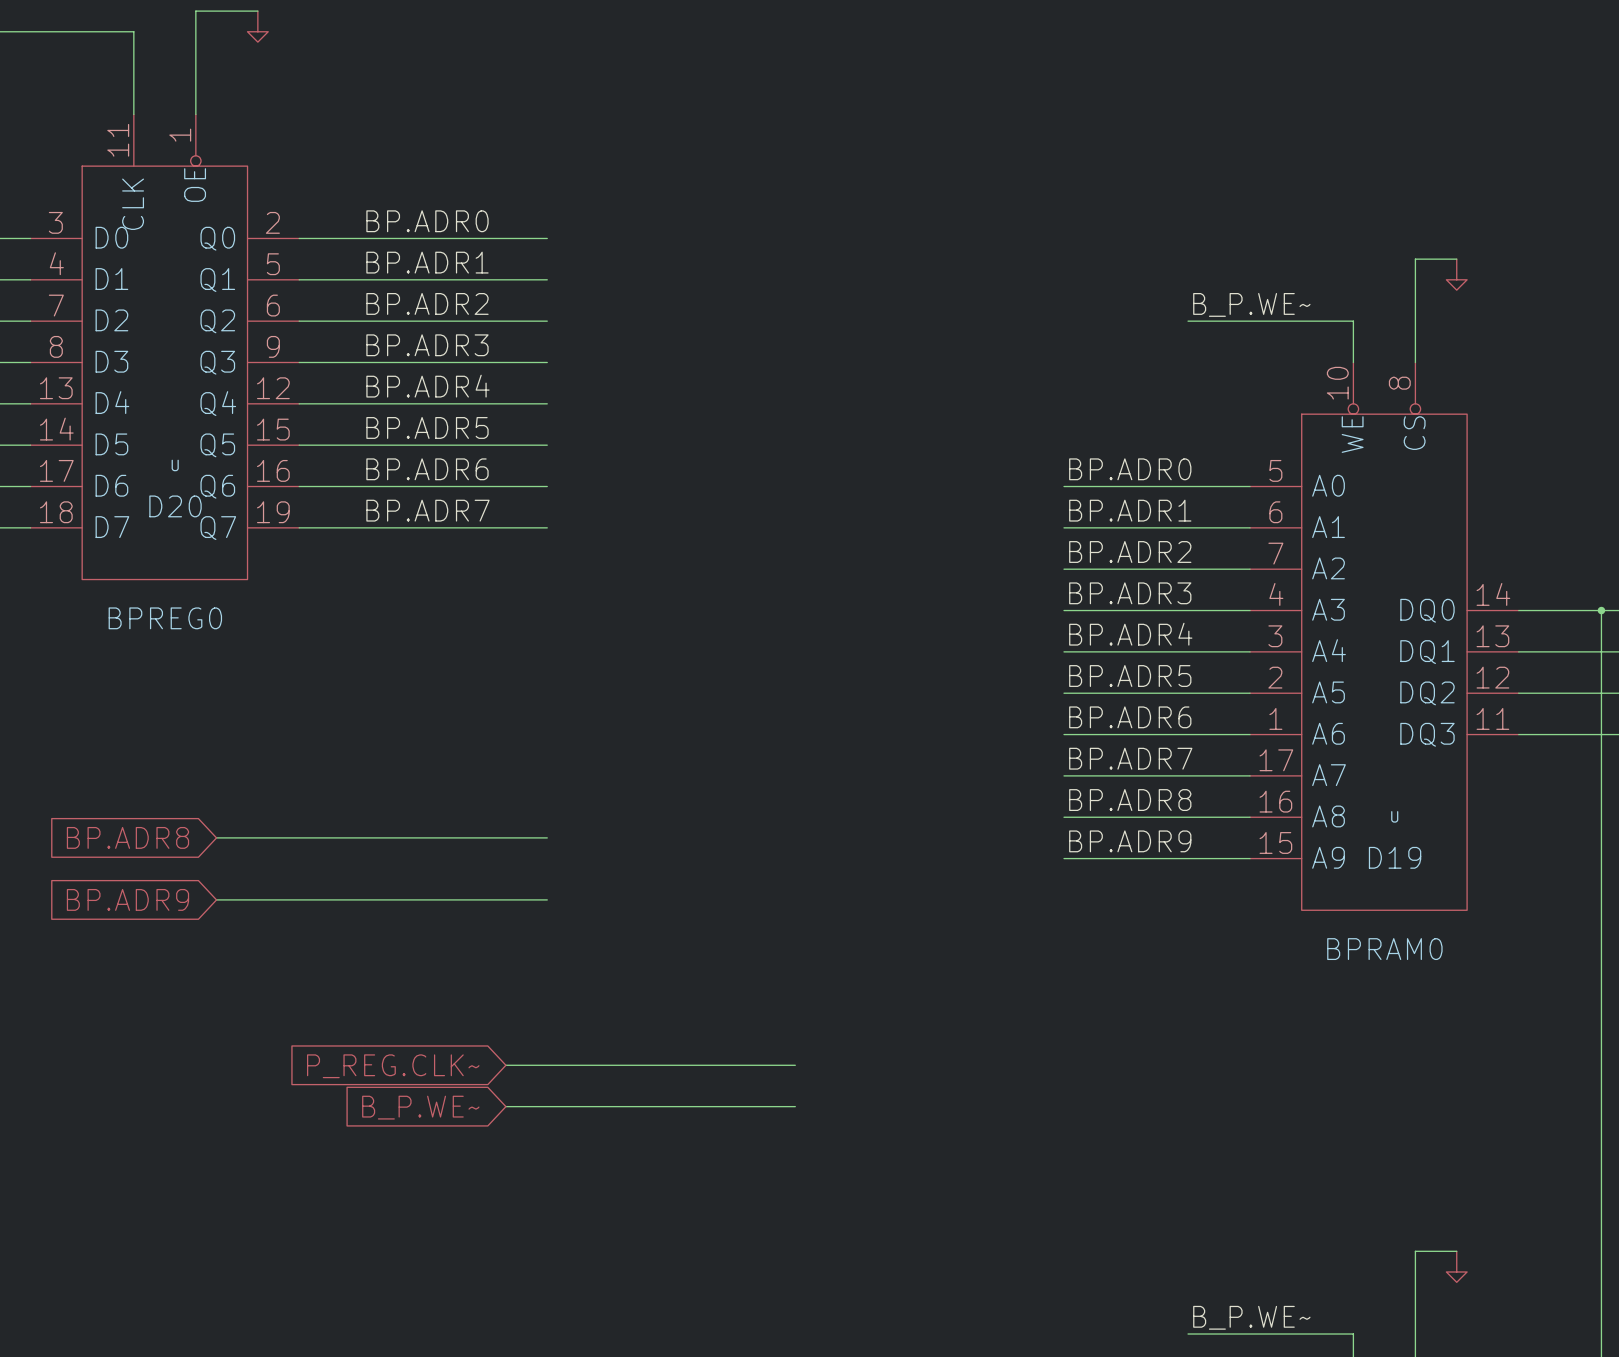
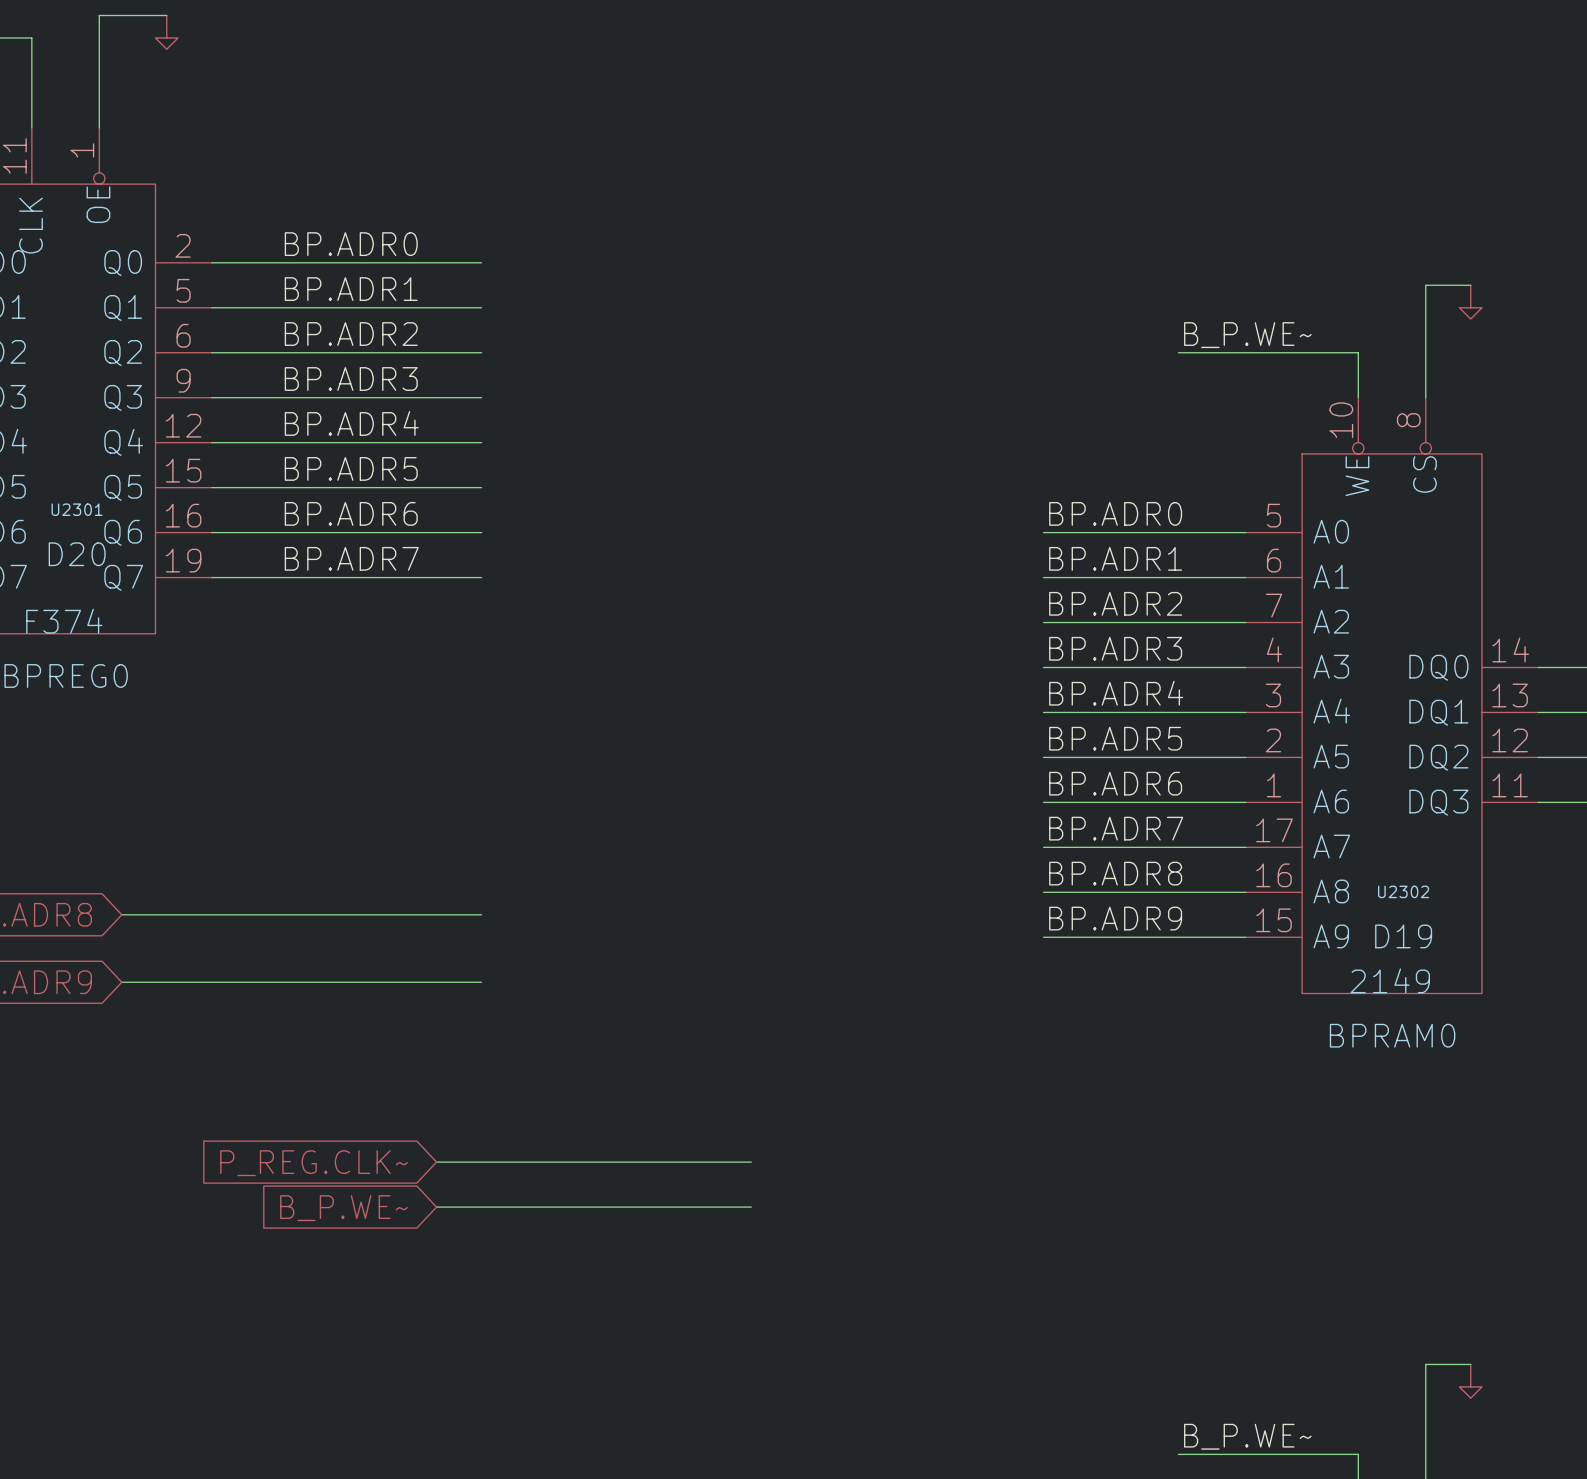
U name: U (175, 465) -> U2301 (77, 509)
U value: none -> F374 (64, 621)
U name: U (1394, 816) -> U2302 (1403, 891)
U value: none -> 2149 (1390, 980)

